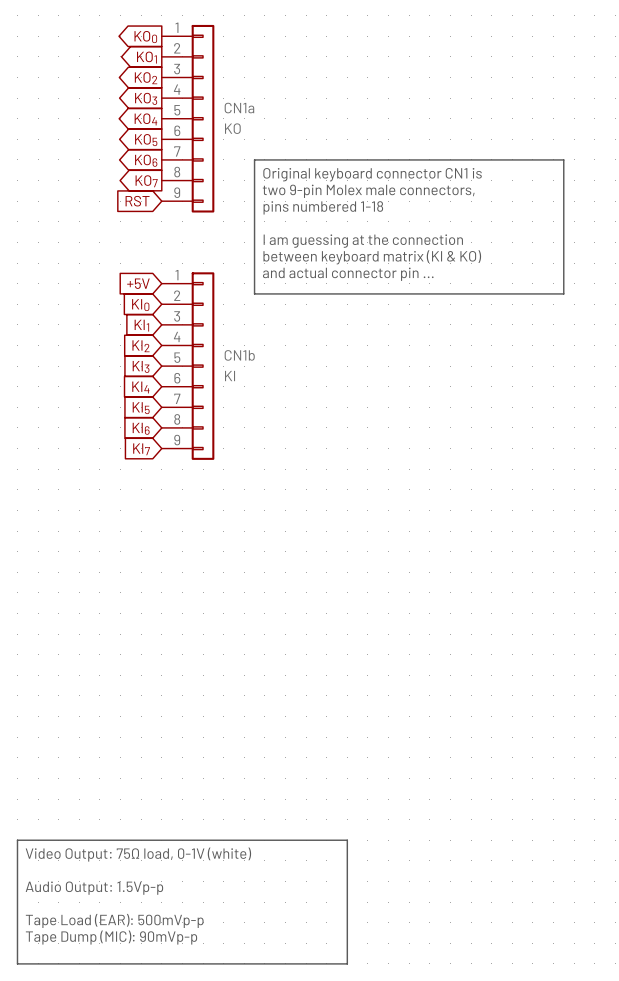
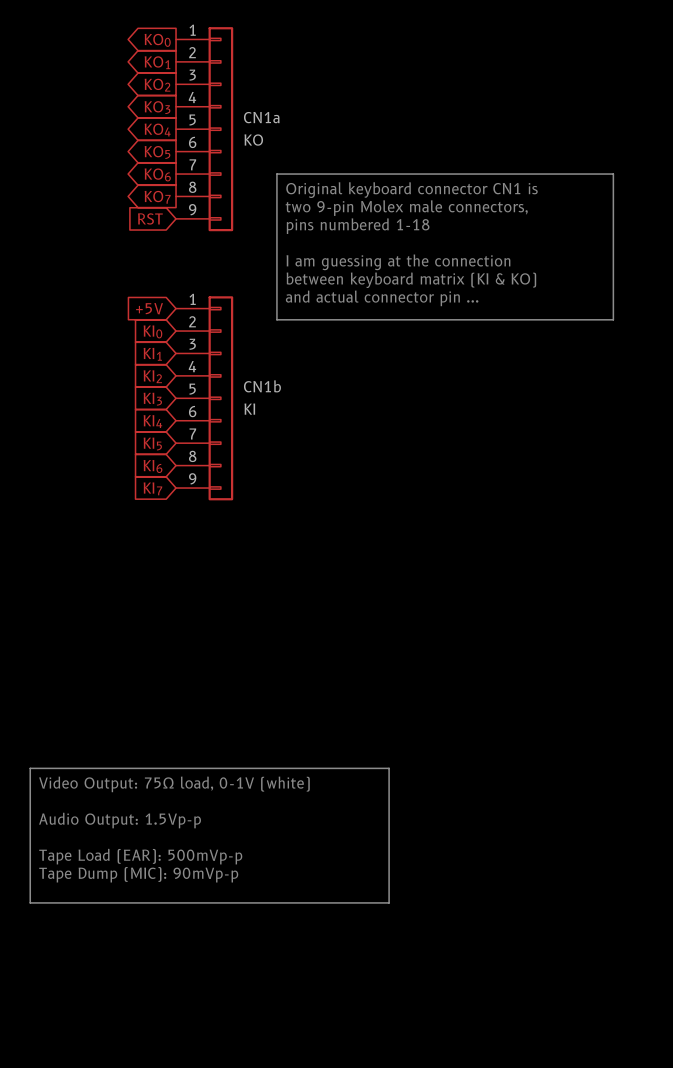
line: (17, 840) (347, 840) (347, 963) (17, 963) (17, 840) -> (30, 768) (389, 768) (389, 902) (30, 902) (30, 768)
text position: Video Output: 75Ω load, 0-1V (white) (138, 854) -> Video Output: 75Ω load, 0-1V (white) (174, 784)
text position: Audio Output: 1.5Vp-p (94, 888) -> Audio Output: 1.5Vp-p (120, 820)
text position: Tape Load (EAR): 500mVp-p (114, 920) -> Tape Load (EAR): 500mVp-p (140, 856)
text position: Tape Dump (MIC): 90mVp-p (111, 937) -> Tape Dump (MIC): 90mVp-p (138, 874)

